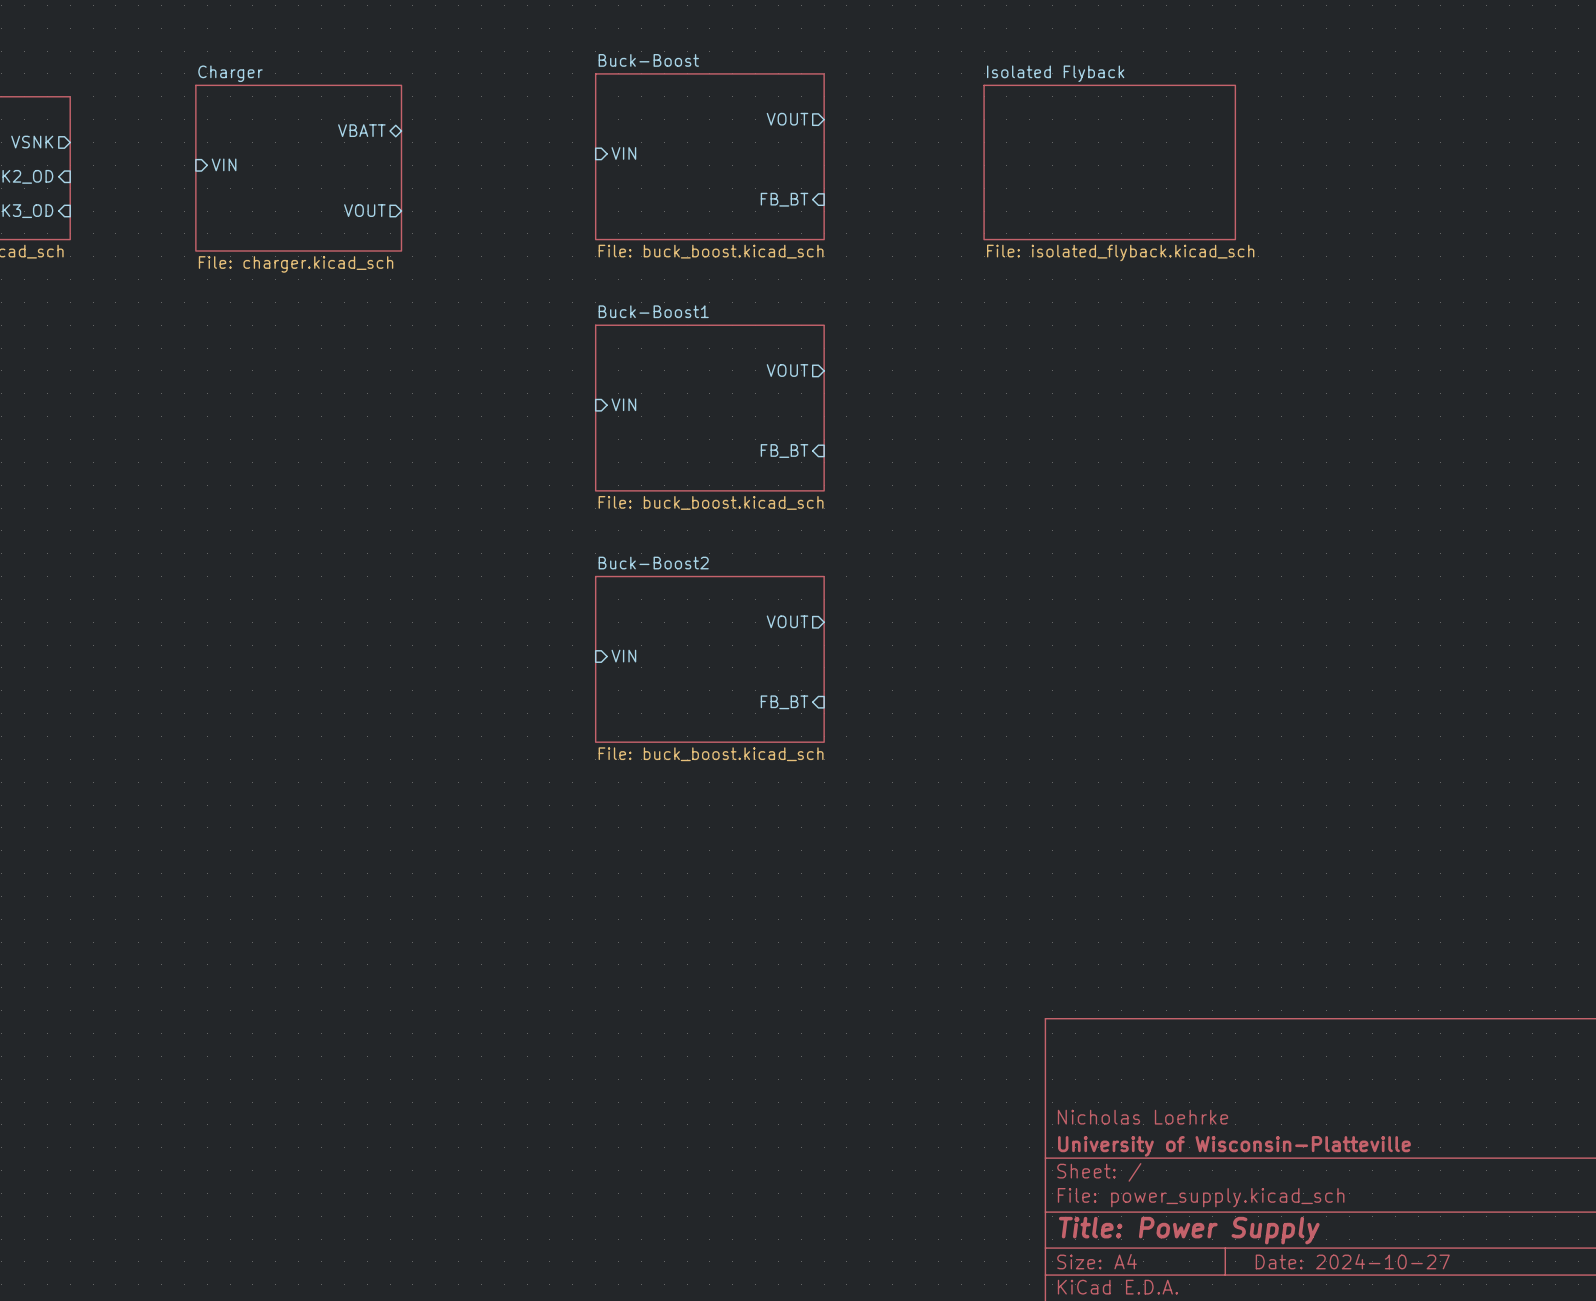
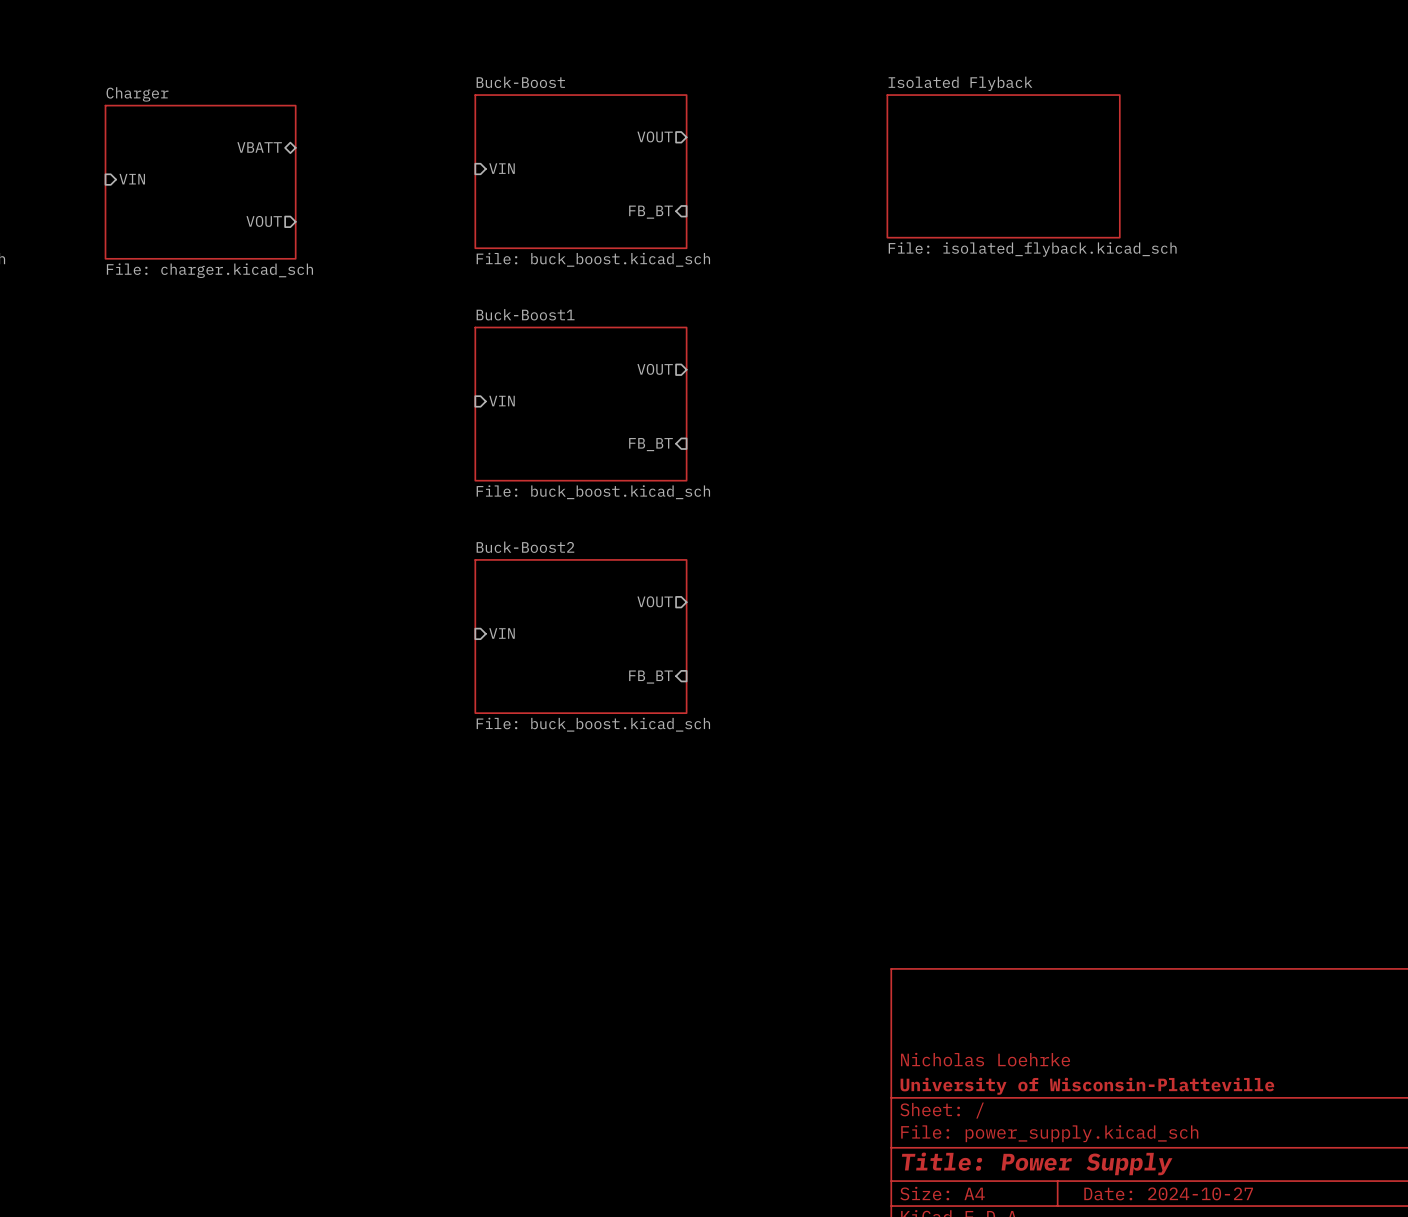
sheet Isolated Flyback position: (1109, 162) -> (1003, 166)

